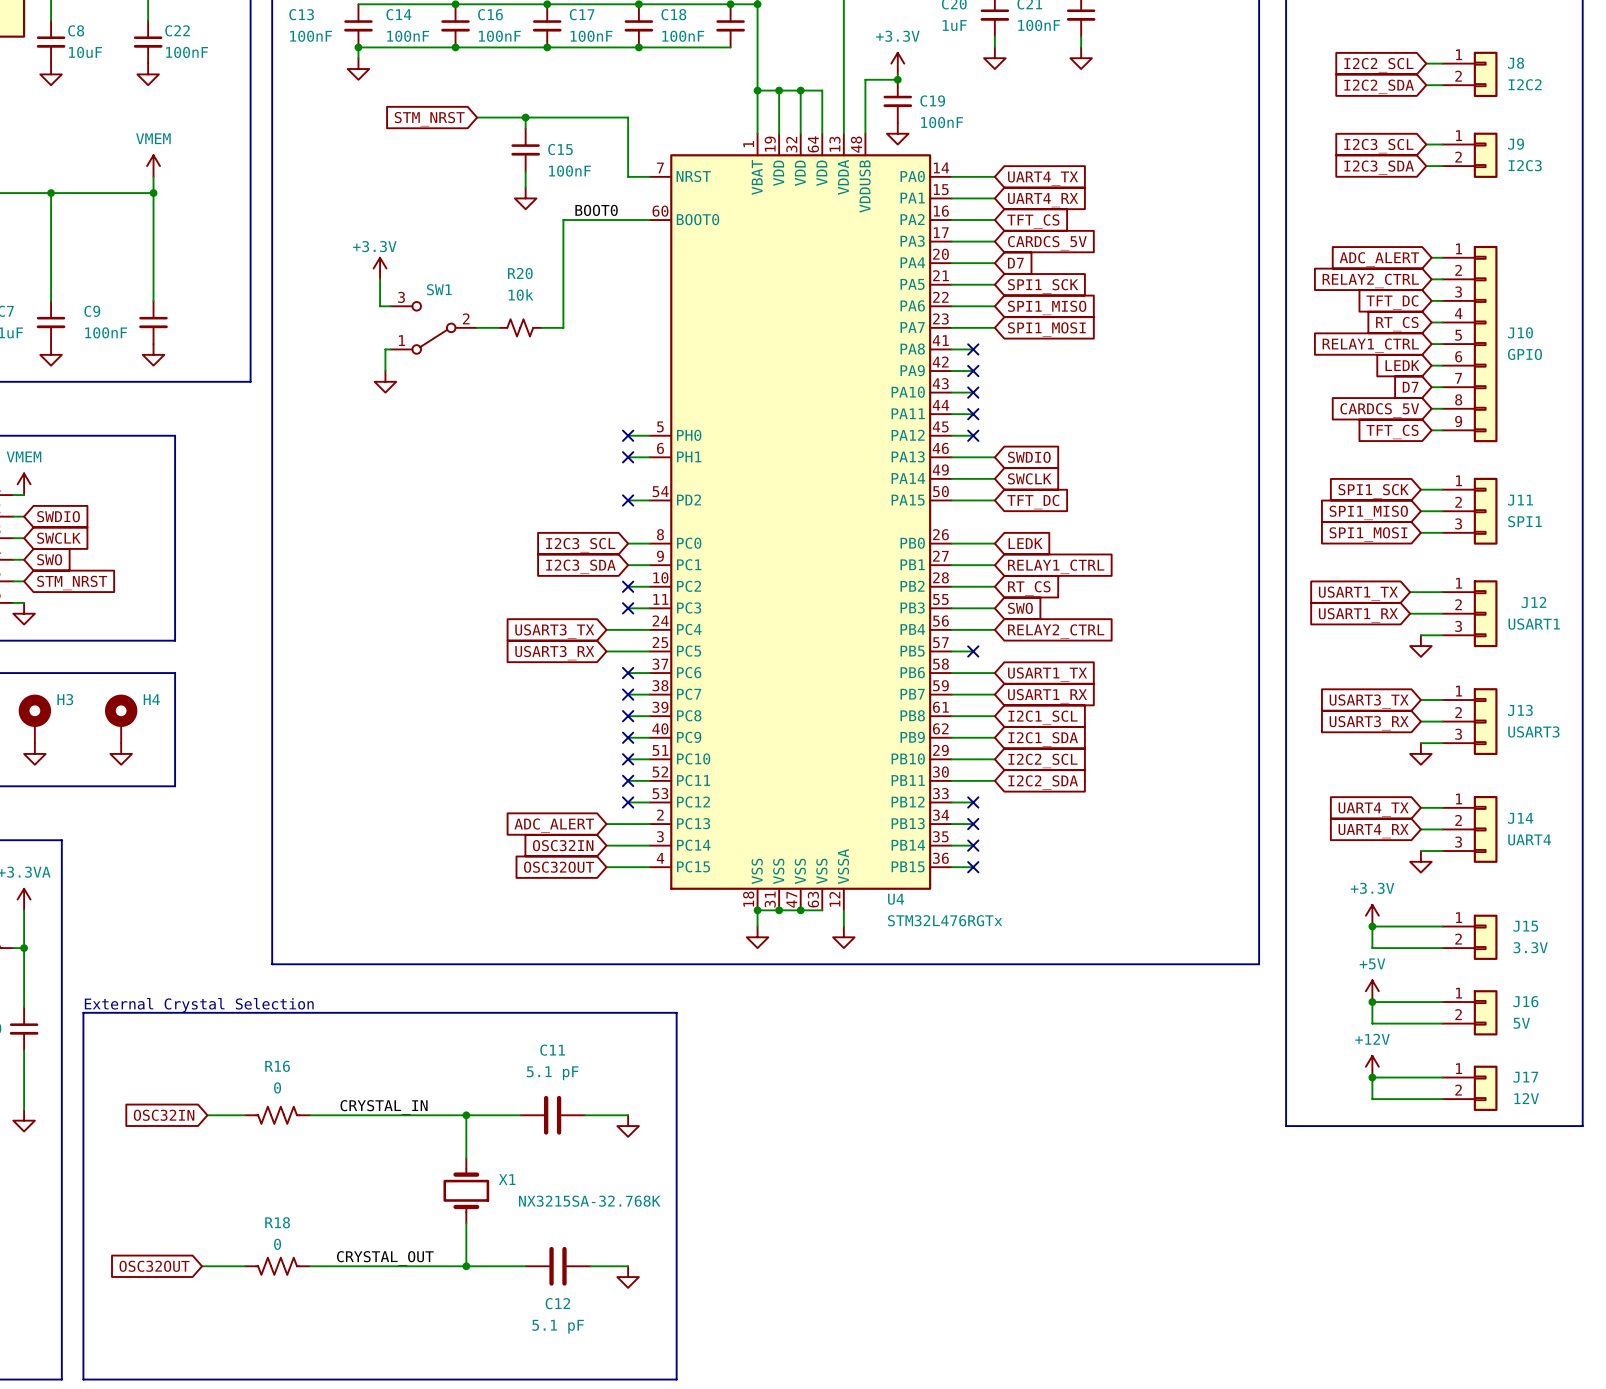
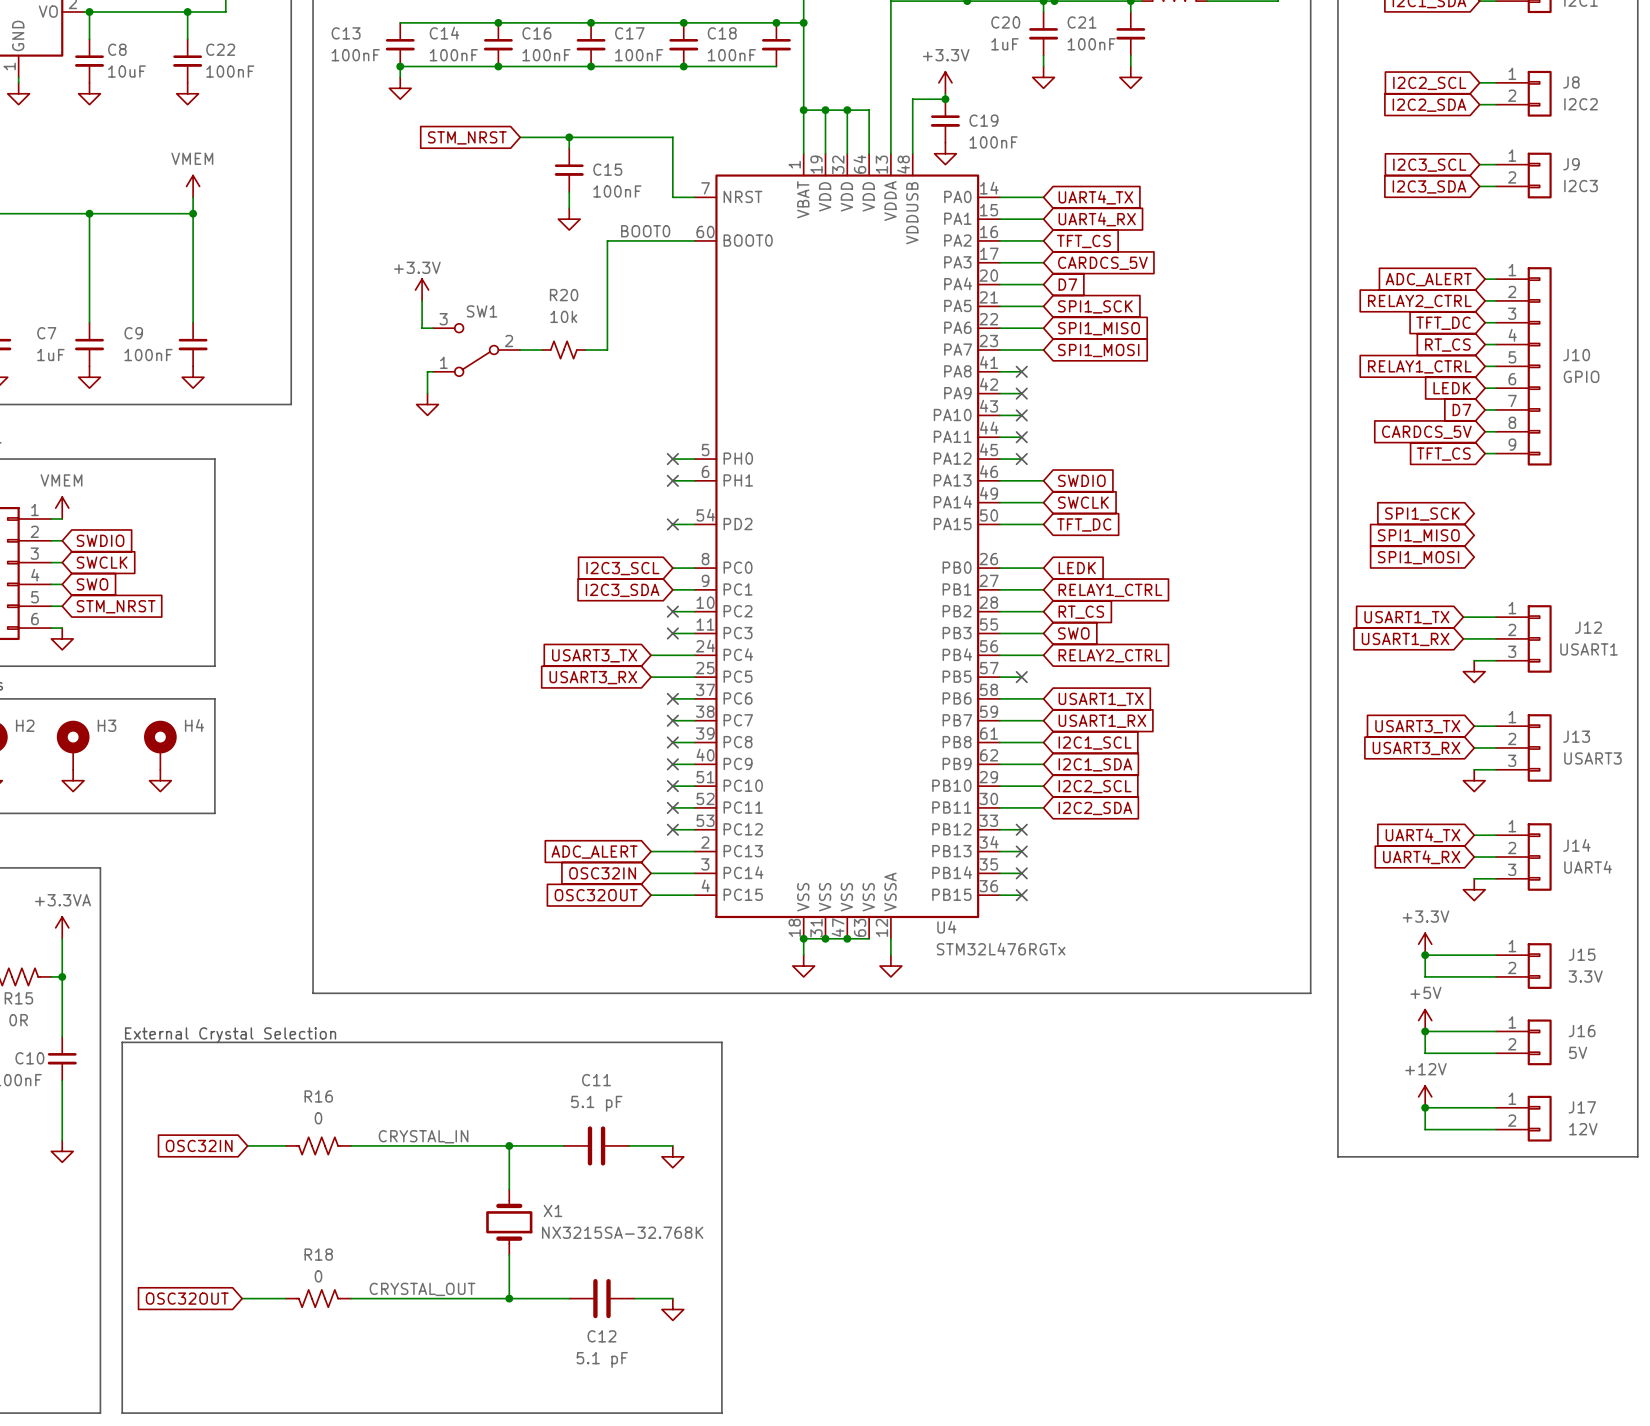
wire: (1420, 489) (1442, 489) -> none
wire: (1420, 511) (1442, 511) -> none
J11: SPI1 (1469, 511) -> none
wire: (1420, 532) (1442, 532) -> none

